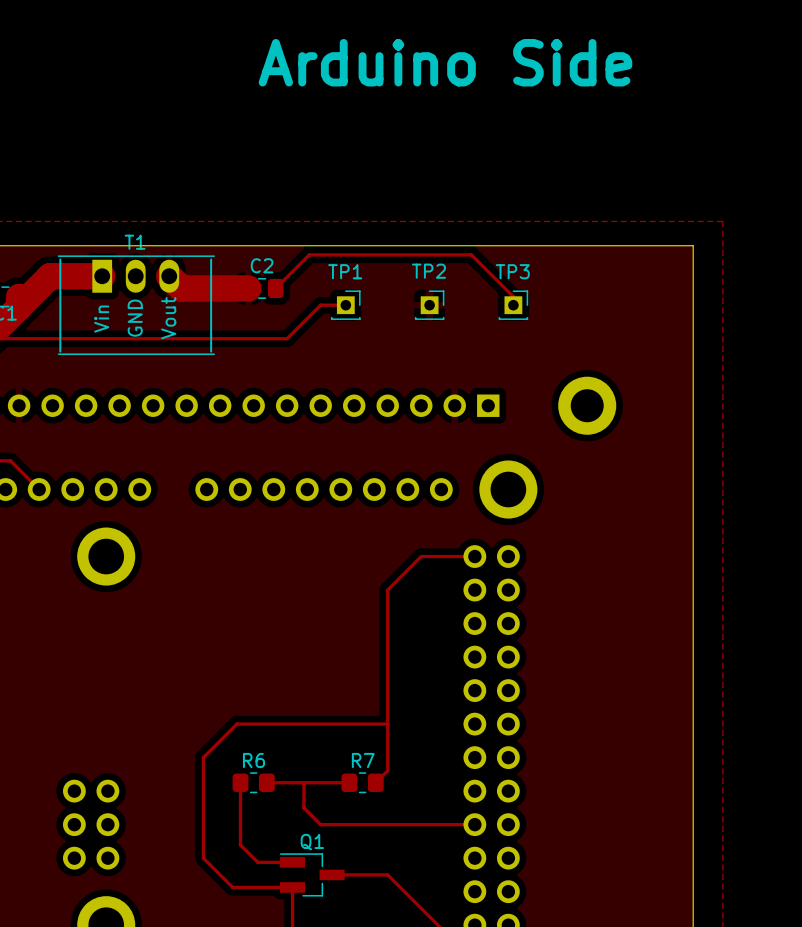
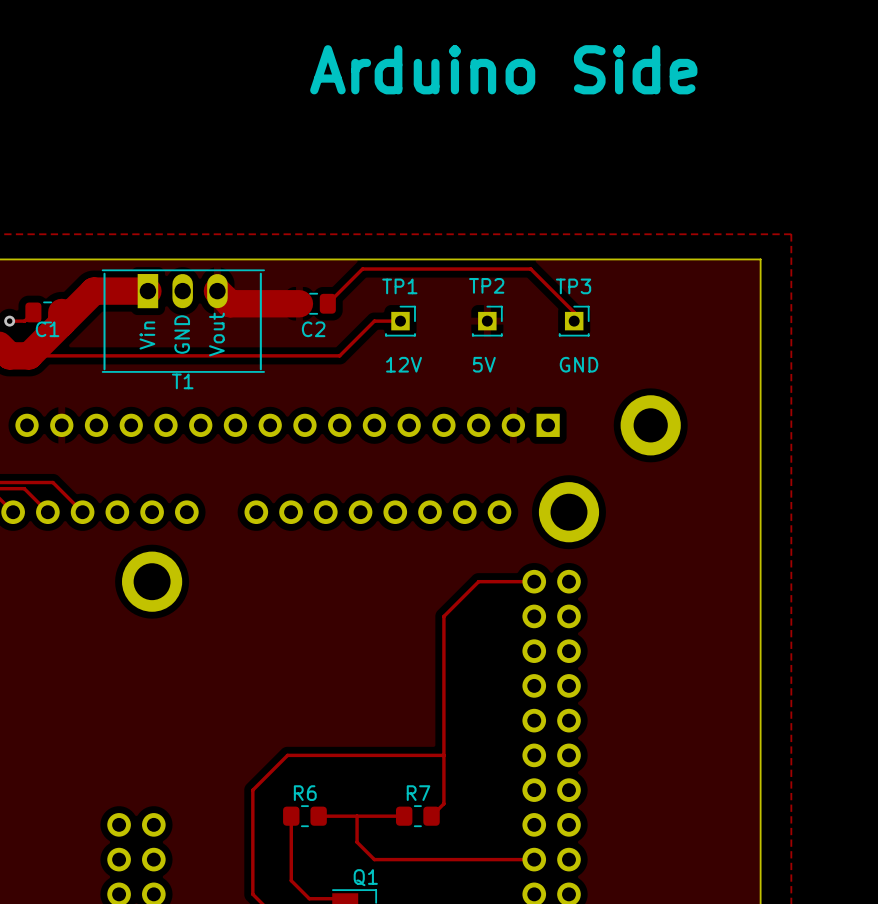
T1 name position: T1 (135, 242) -> T1 (182, 381)
C2 name position: C2 (262, 265) -> C2 (313, 329)
text: none -> 12V (404, 364)
text: none -> 5V (484, 364)
text: none -> GND (579, 364)

